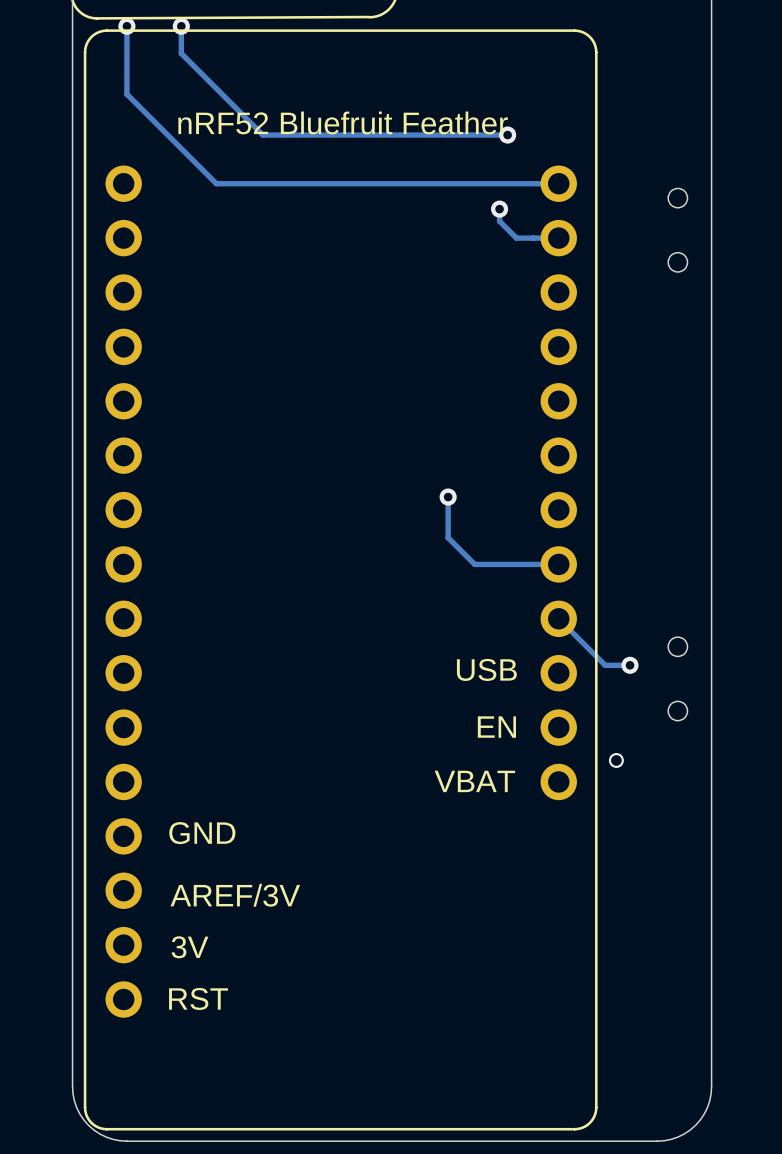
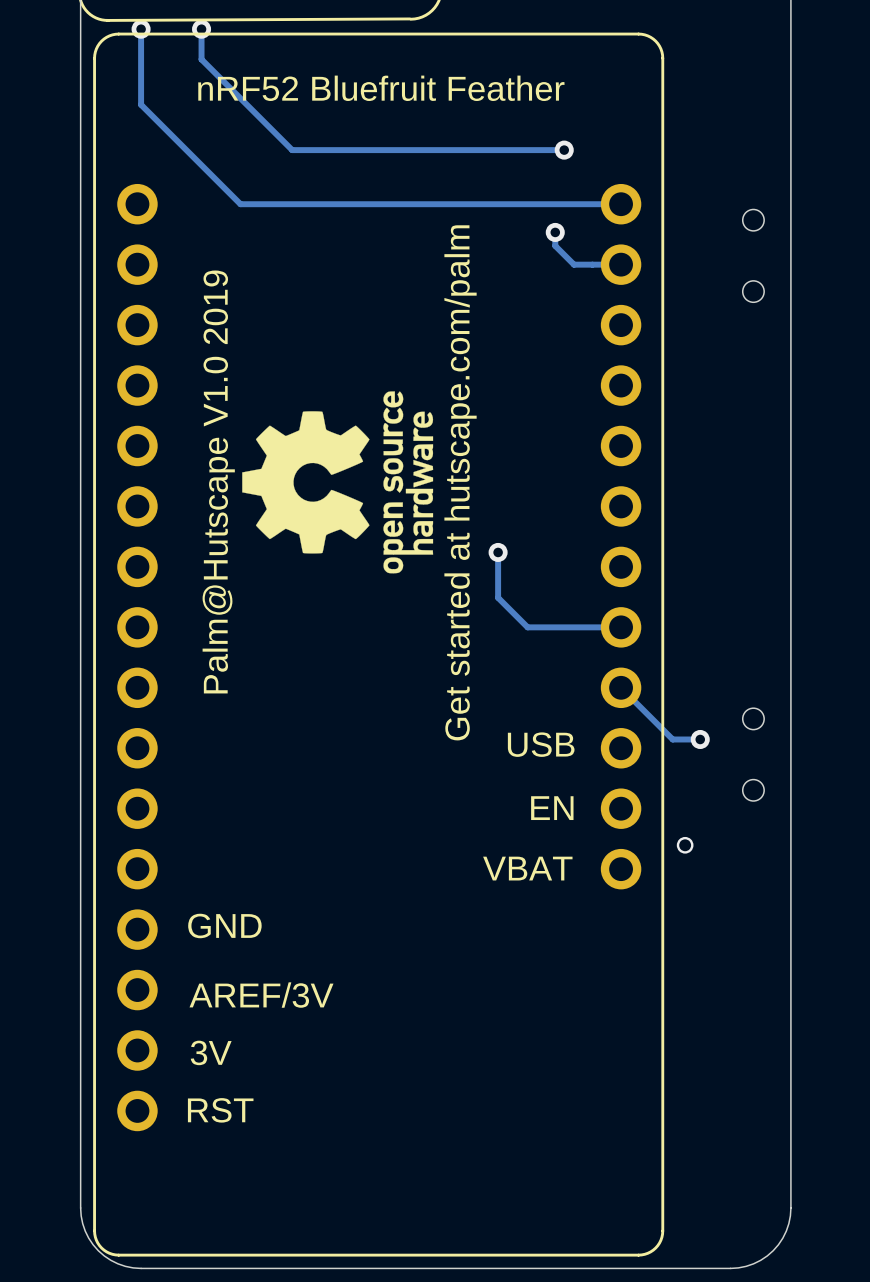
part text position: nRF52 Bluefruit Feather (343, 122) -> nRF52 Bluefruit Feather (381, 88)
drawing: none -> [242, 391, 434, 574]
text: none -> Palm@Hutscape V1.0 2019 (218, 481)
text: none -> Get started at hutscape.com/palm (460, 482)

